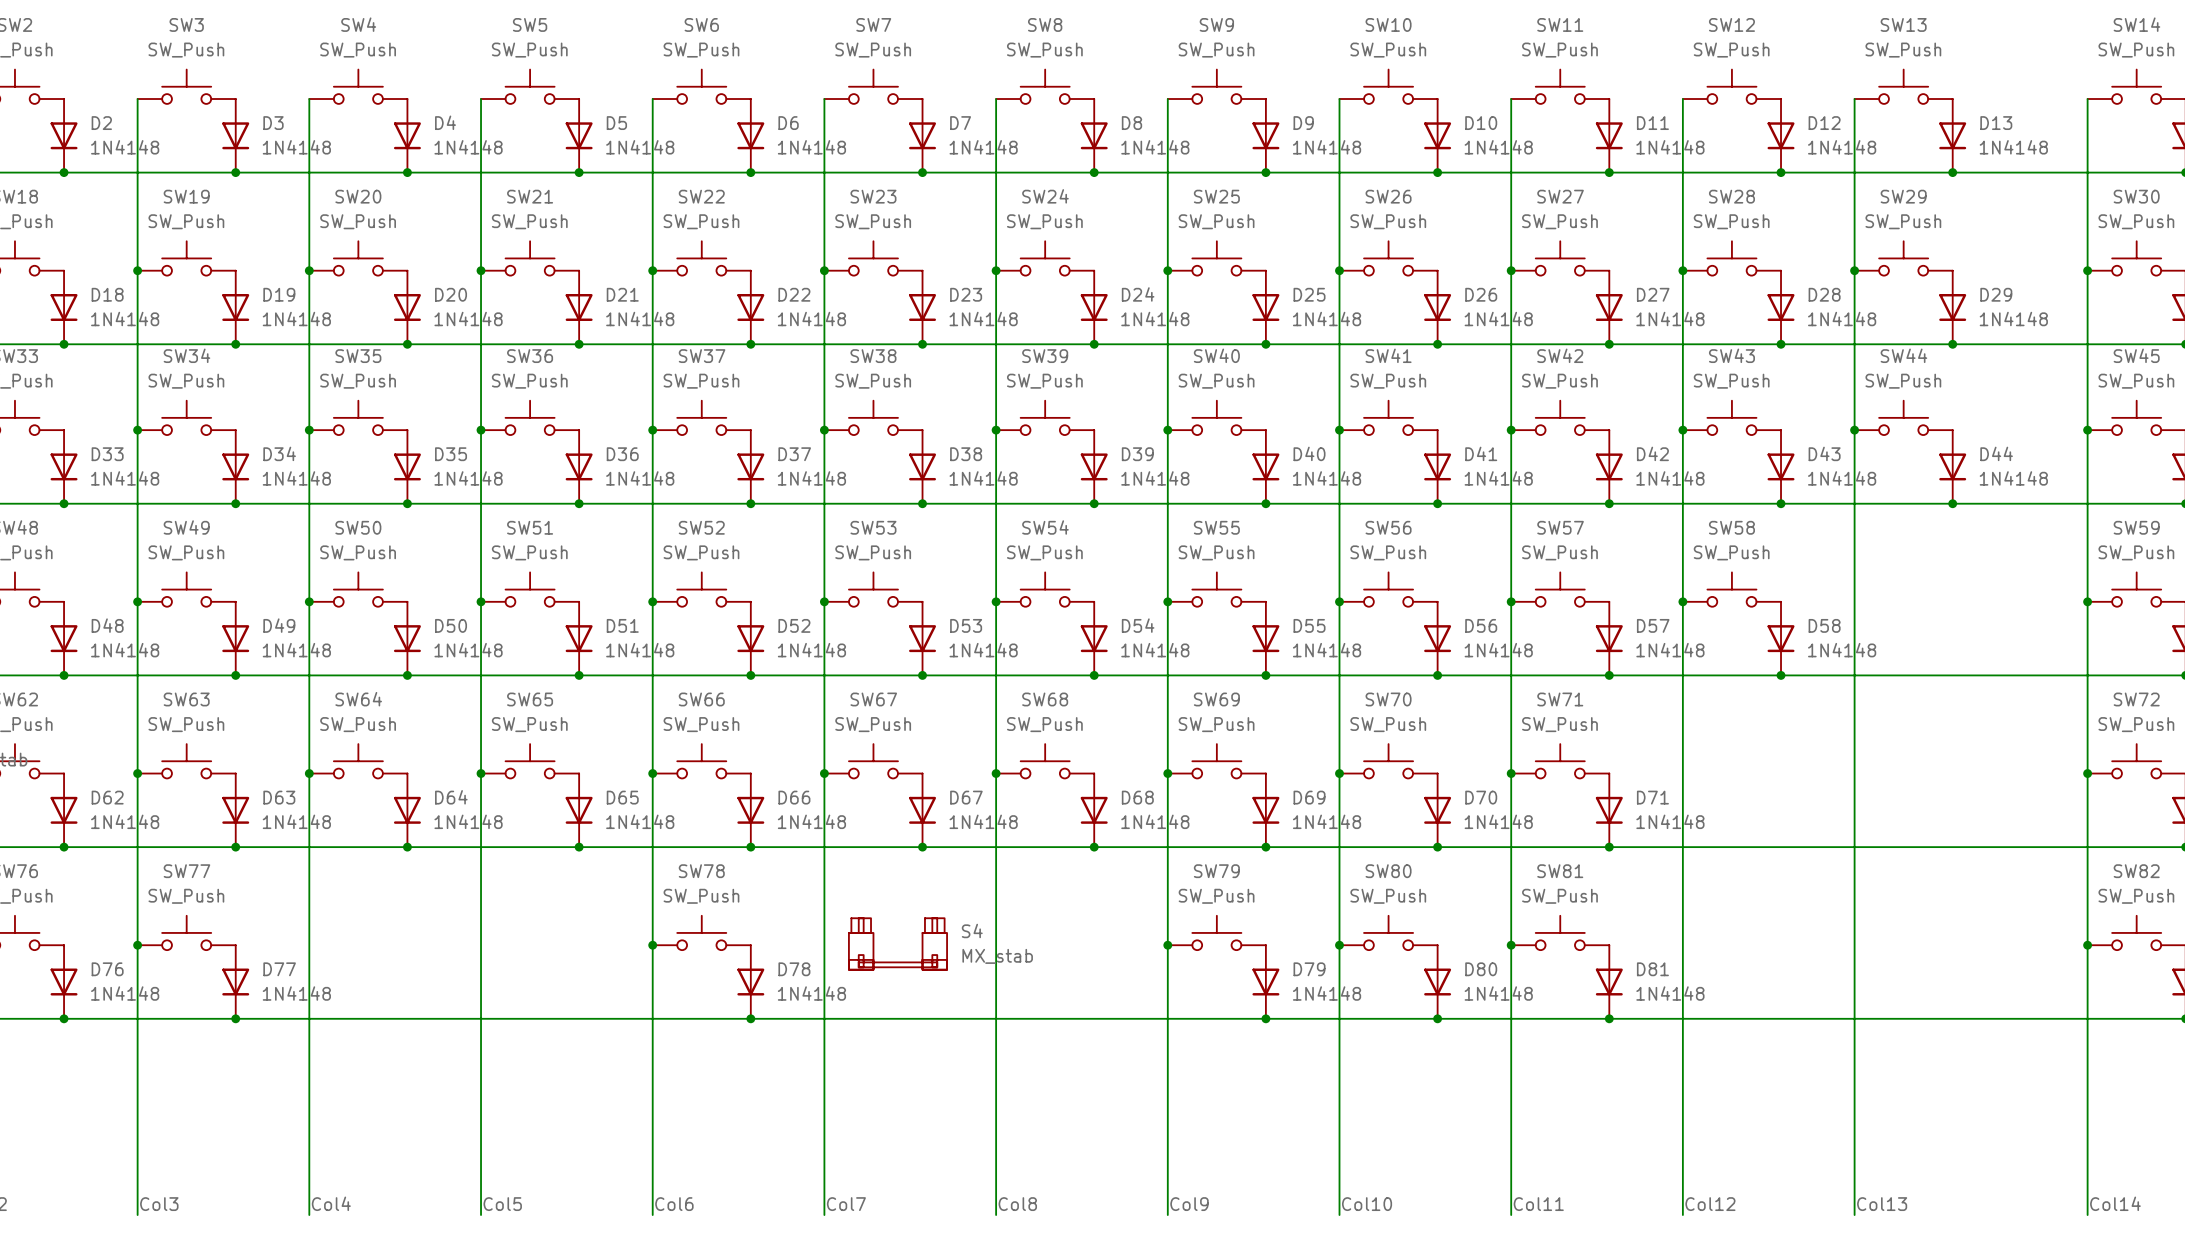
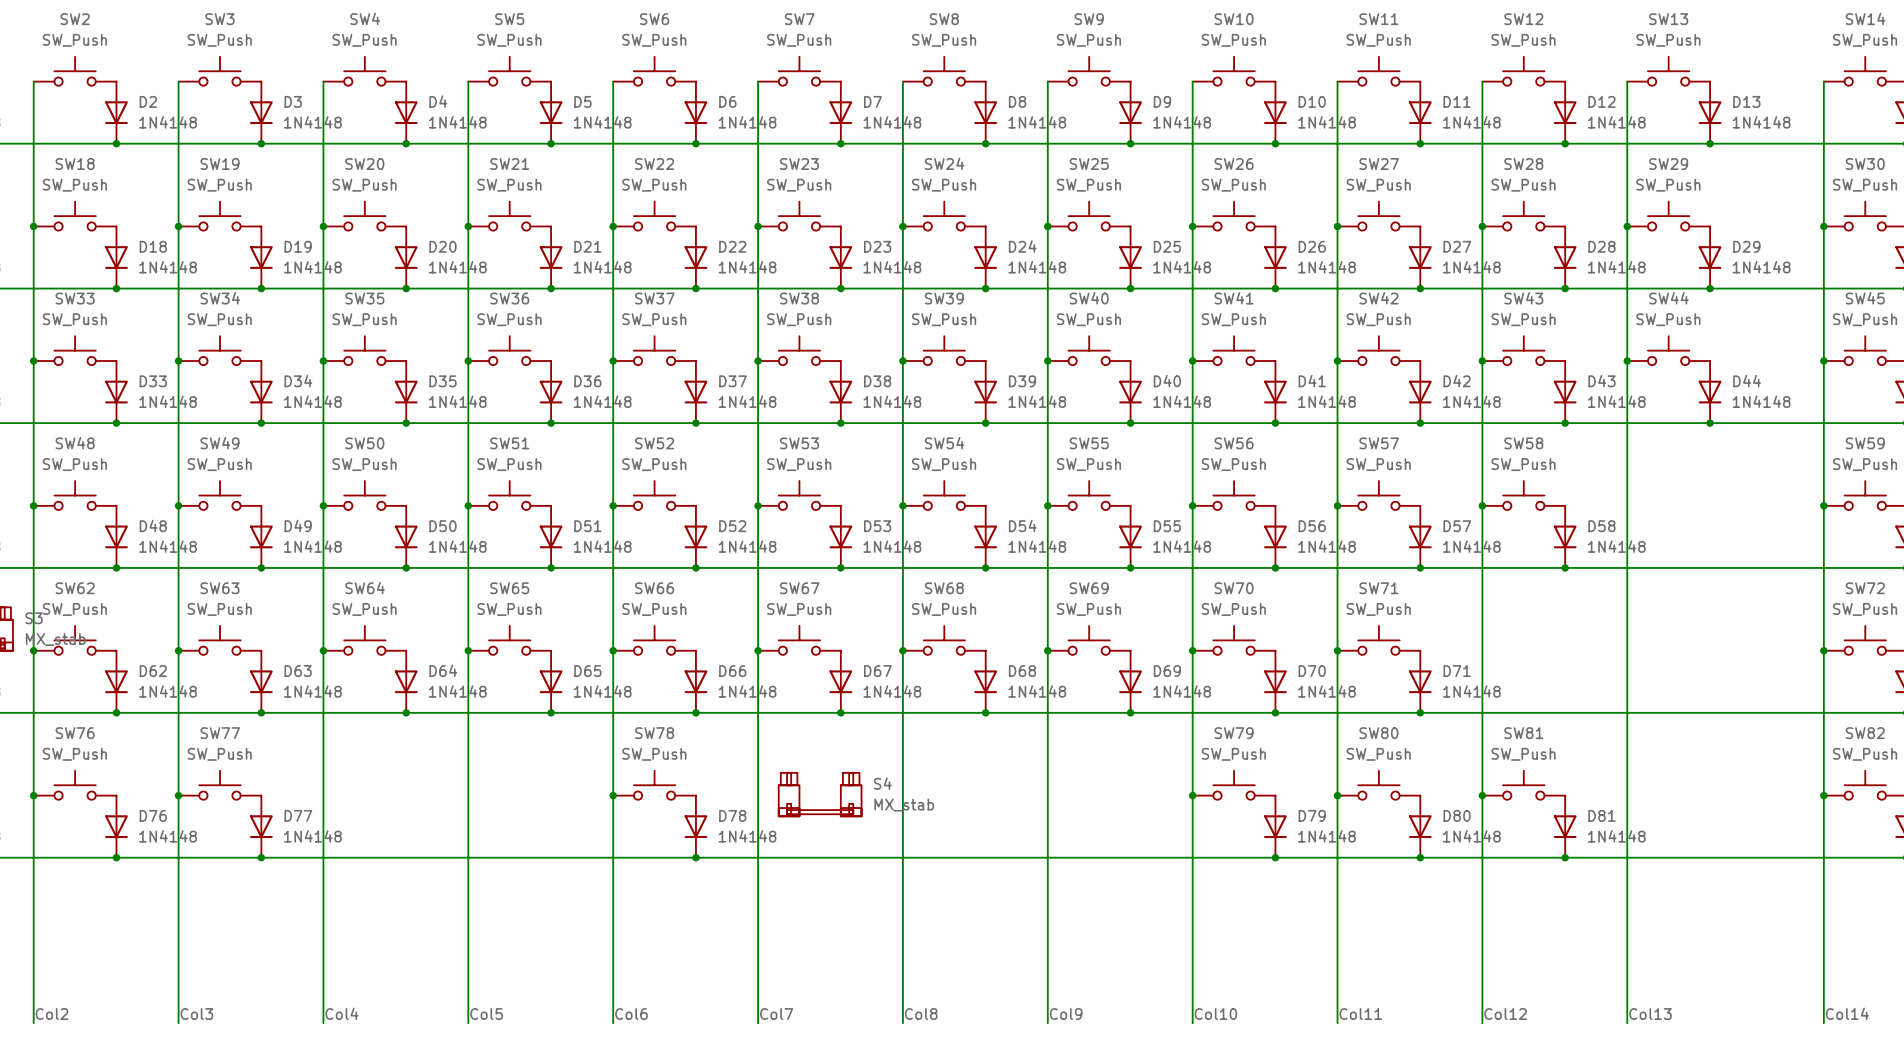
SW80 name: SW80 (1388, 871) -> SW79 (1234, 733)
SW81 name: SW81 (1560, 871) -> SW80 (1378, 733)
SW79: SW_Push (1216, 932) -> none
SW81: none -> SW_Push (1523, 785)
junction: (1167, 945) -> none
junction: none -> (1482, 795)
D80 name: D80 (1481, 969) -> D79 (1312, 815)
D81 name: D81 (1652, 969) -> D80 (1457, 815)
D79: 1N4148 (1265, 982) -> none
D81: none -> 1N4148 (1565, 826)
junction: (1265, 1018) -> none
junction: none -> (1565, 857)

